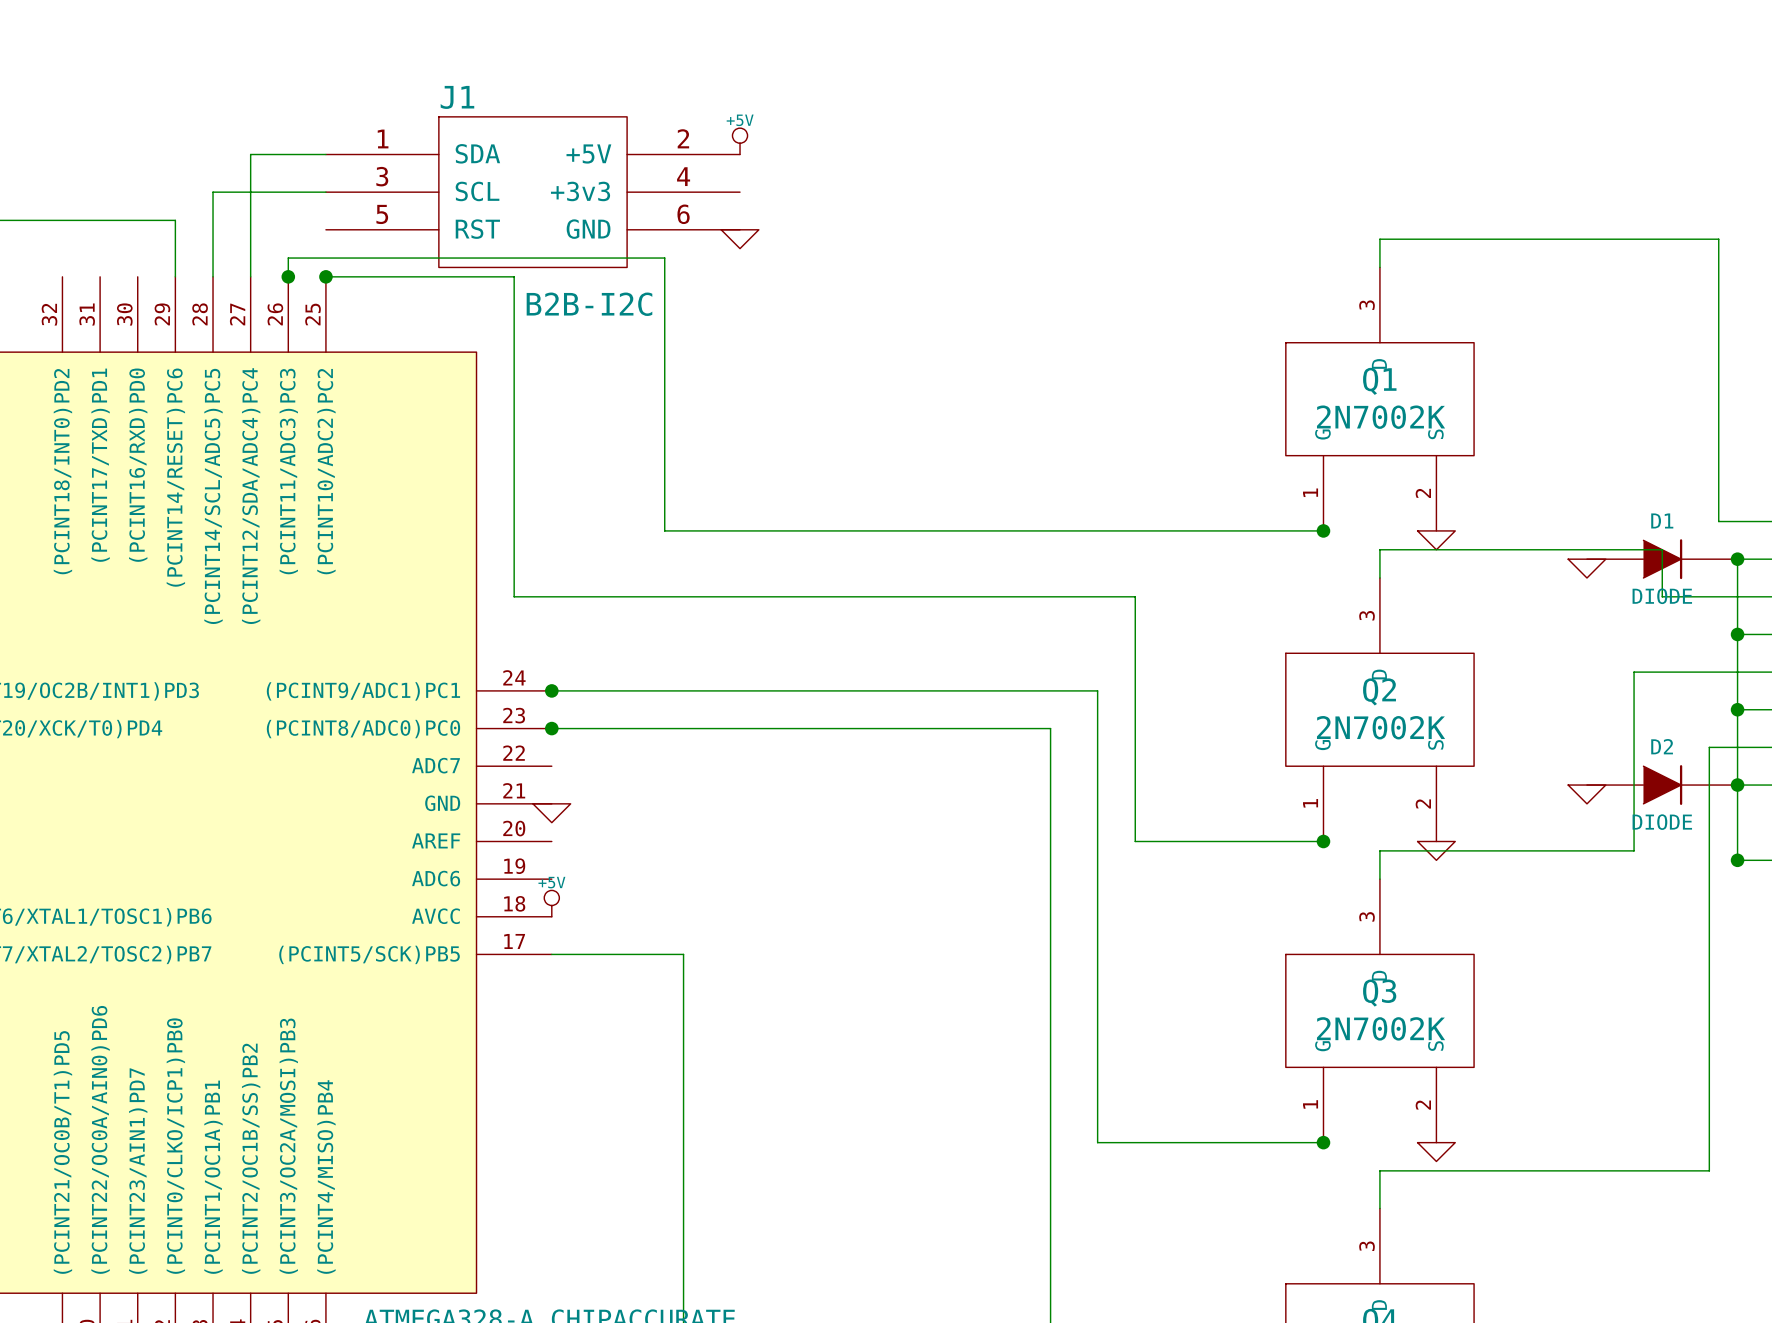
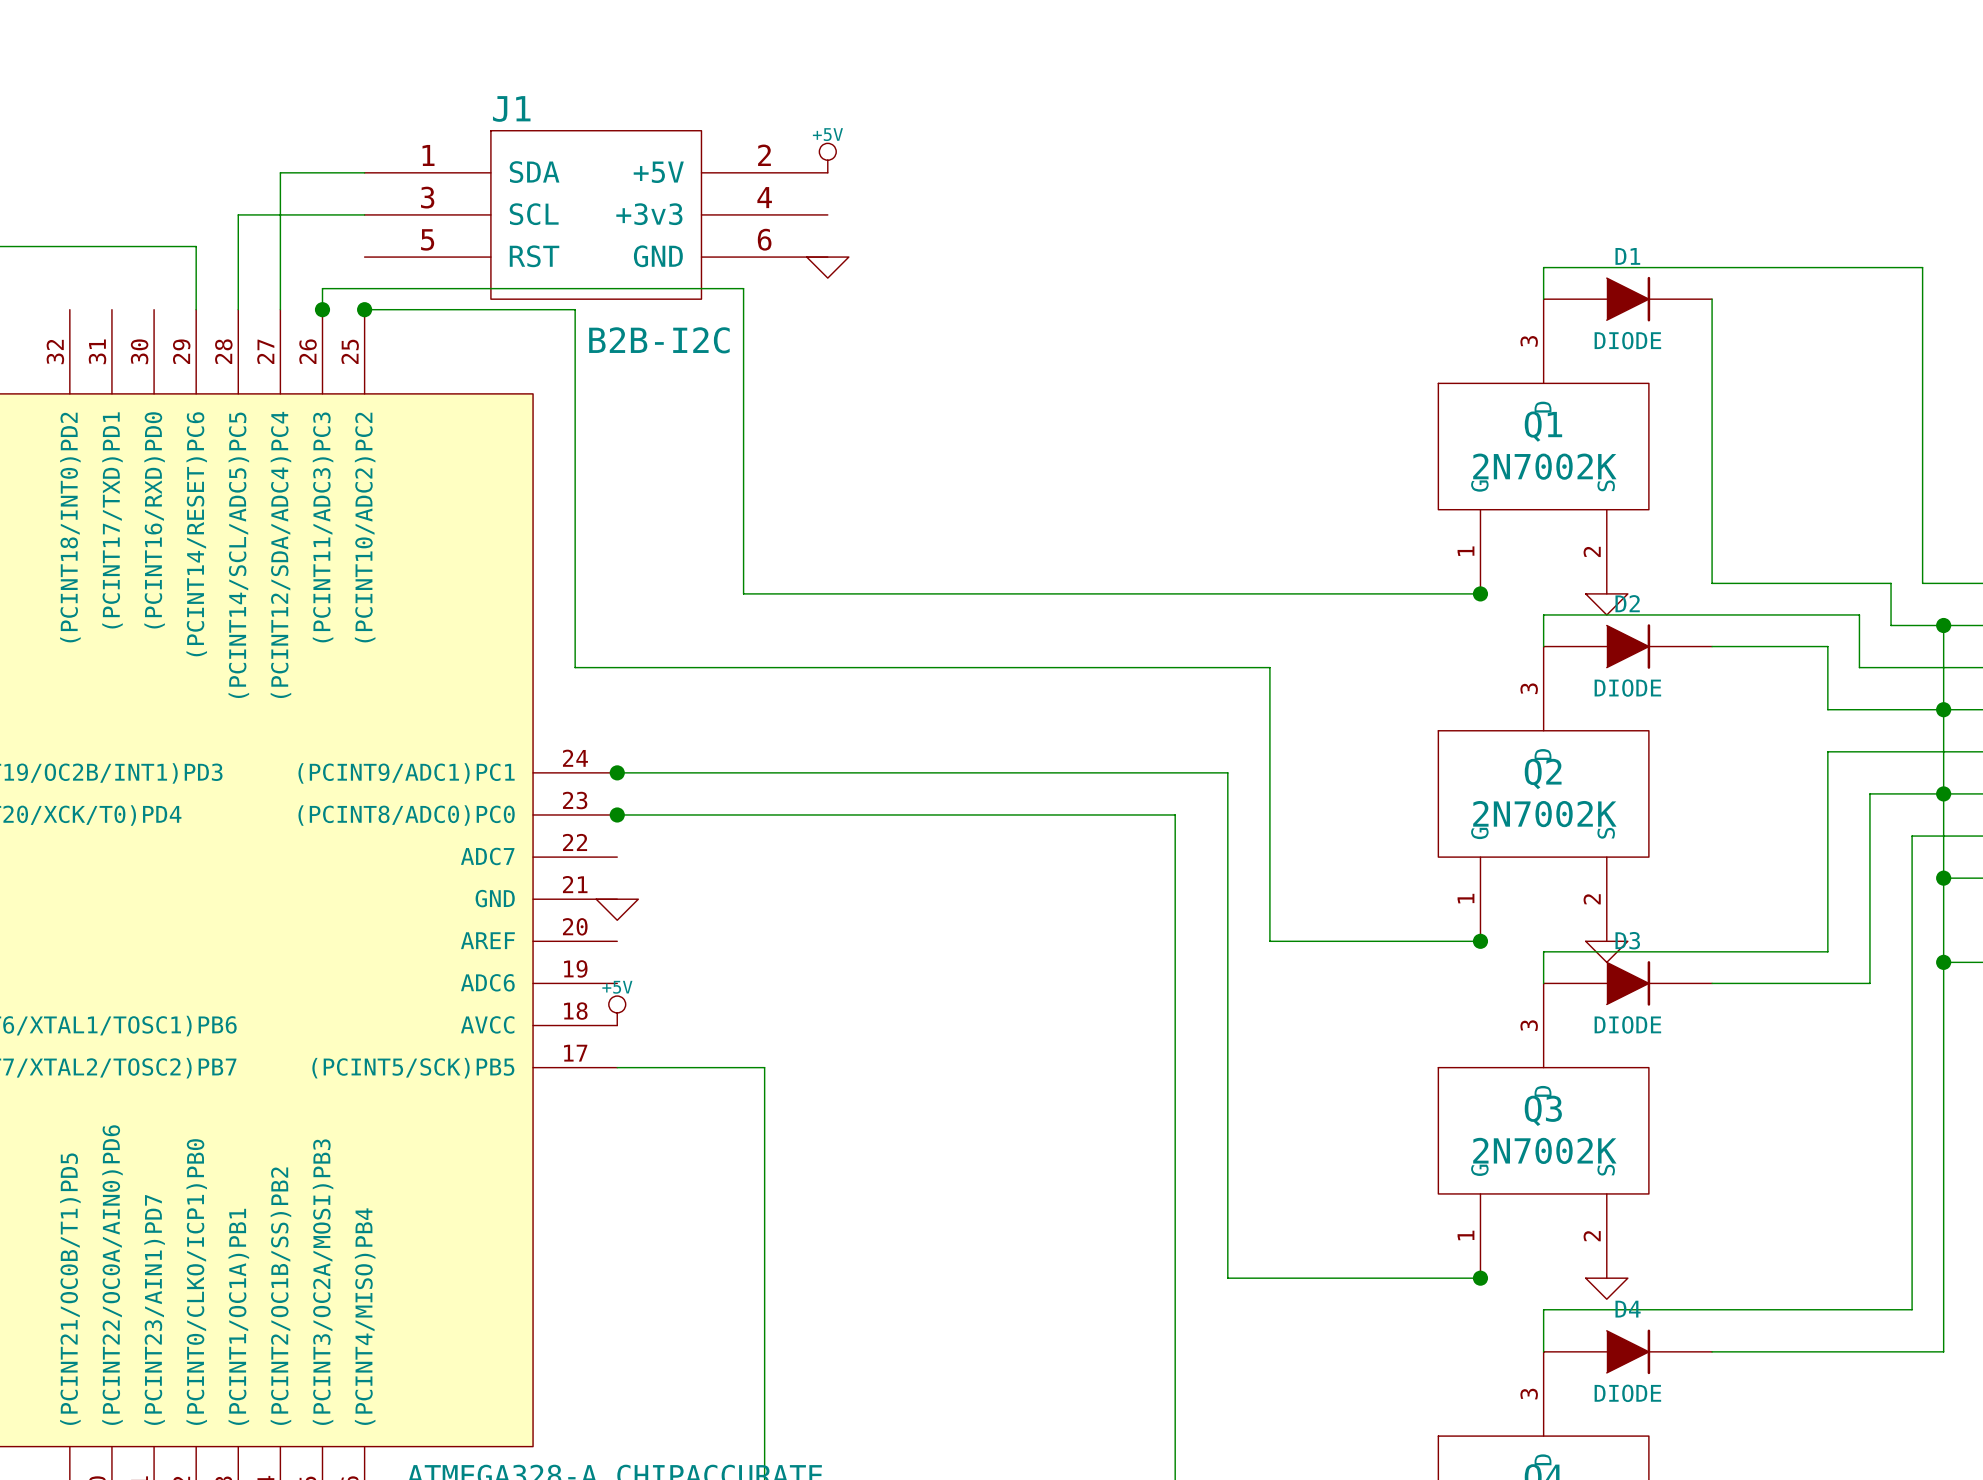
wire: none -> (1712, 299) (1712, 583) (1891, 583) (1891, 625) (1943, 625)
D1 position: (1662, 559) -> (1627, 299)
power symbol: (1586, 568) -> none
wire: none -> (1712, 646) (1827, 646) (1827, 709) (1943, 709)
wire: none -> (1943, 793) (1869, 793) (1869, 983) (1712, 983)
D2 position: (1662, 785) -> (1627, 646)
power symbol: (1586, 794) -> none
wire: none -> (1943, 962) (1943, 1351) (1712, 1351)
D3: none -> DIODE (1627, 983)
D4: none -> DIODE (1627, 1351)

